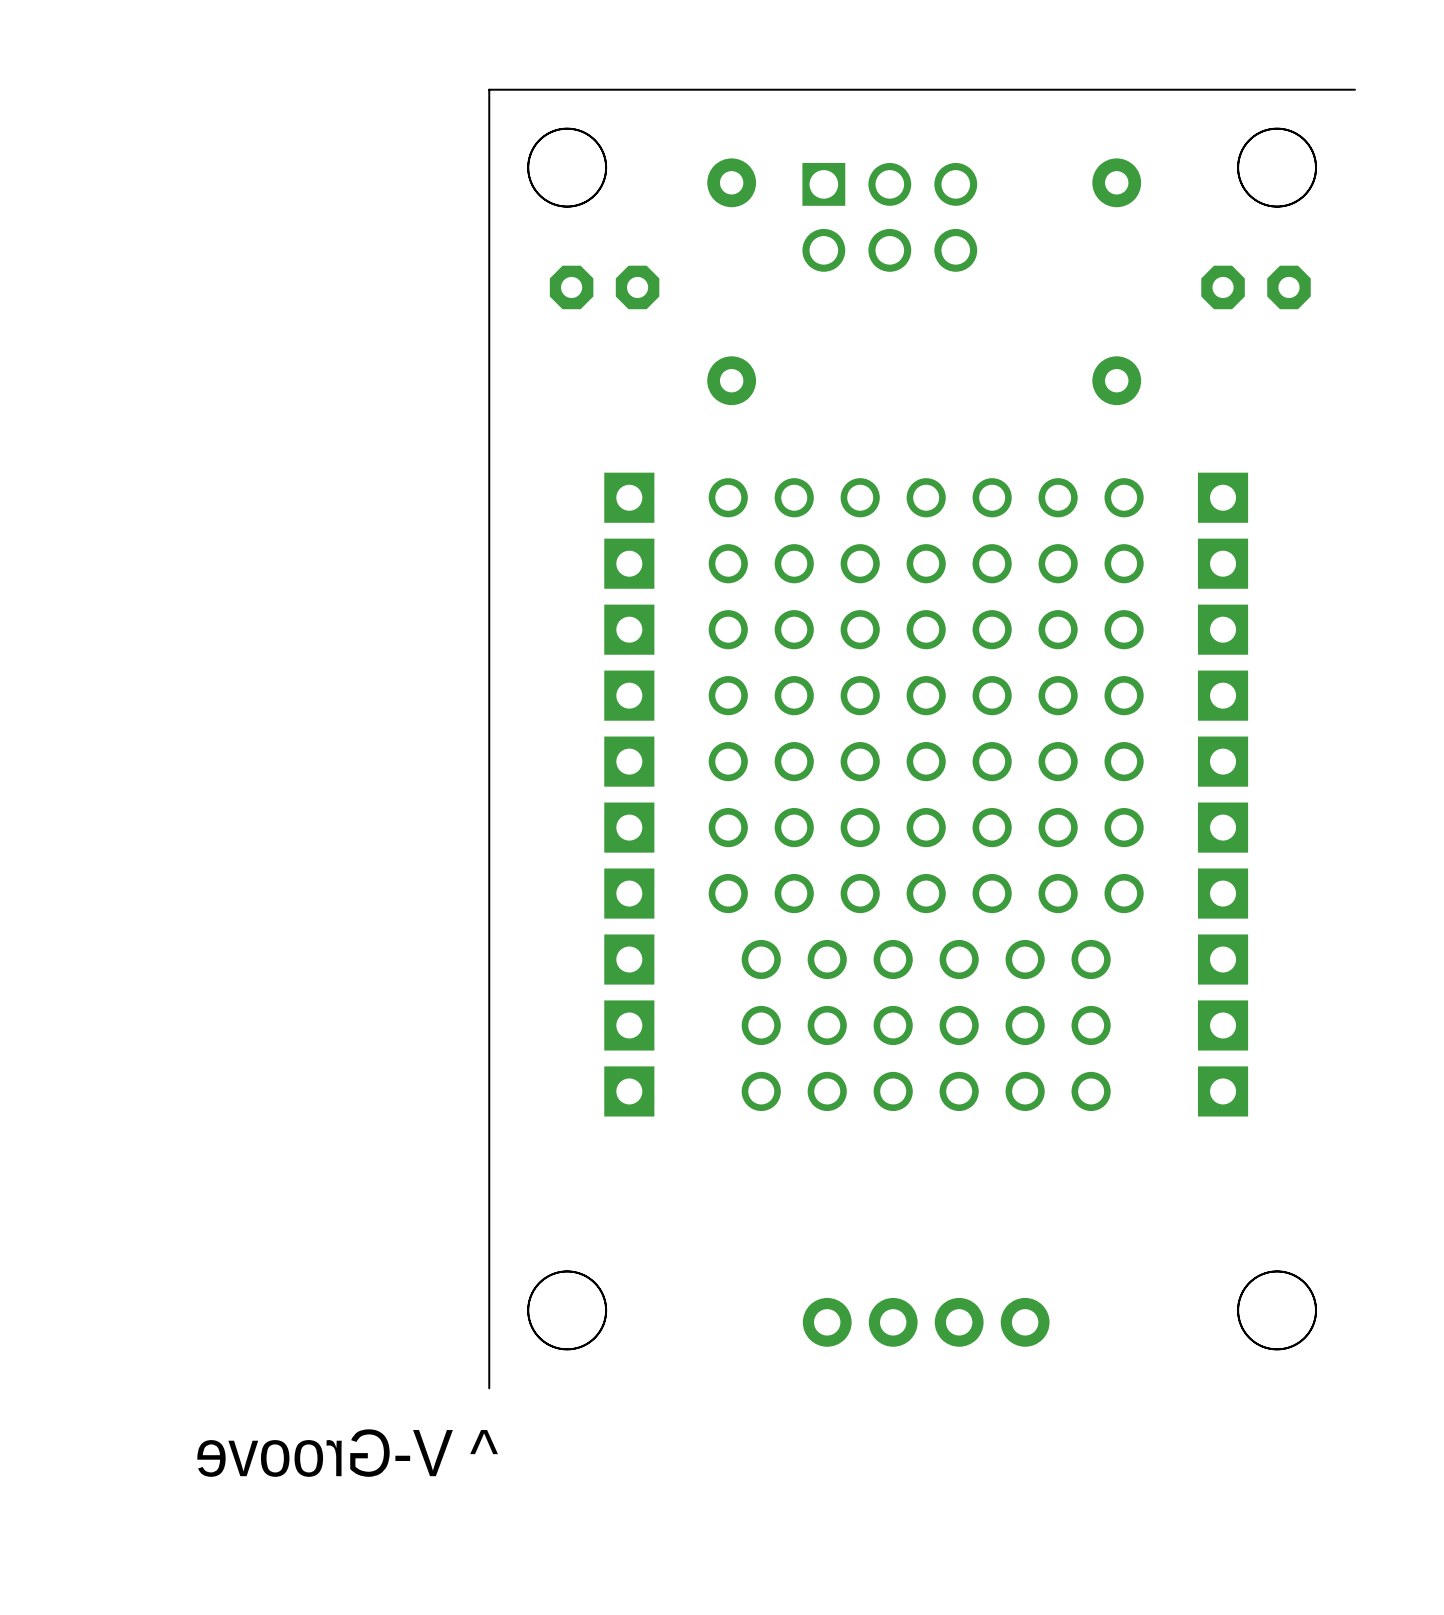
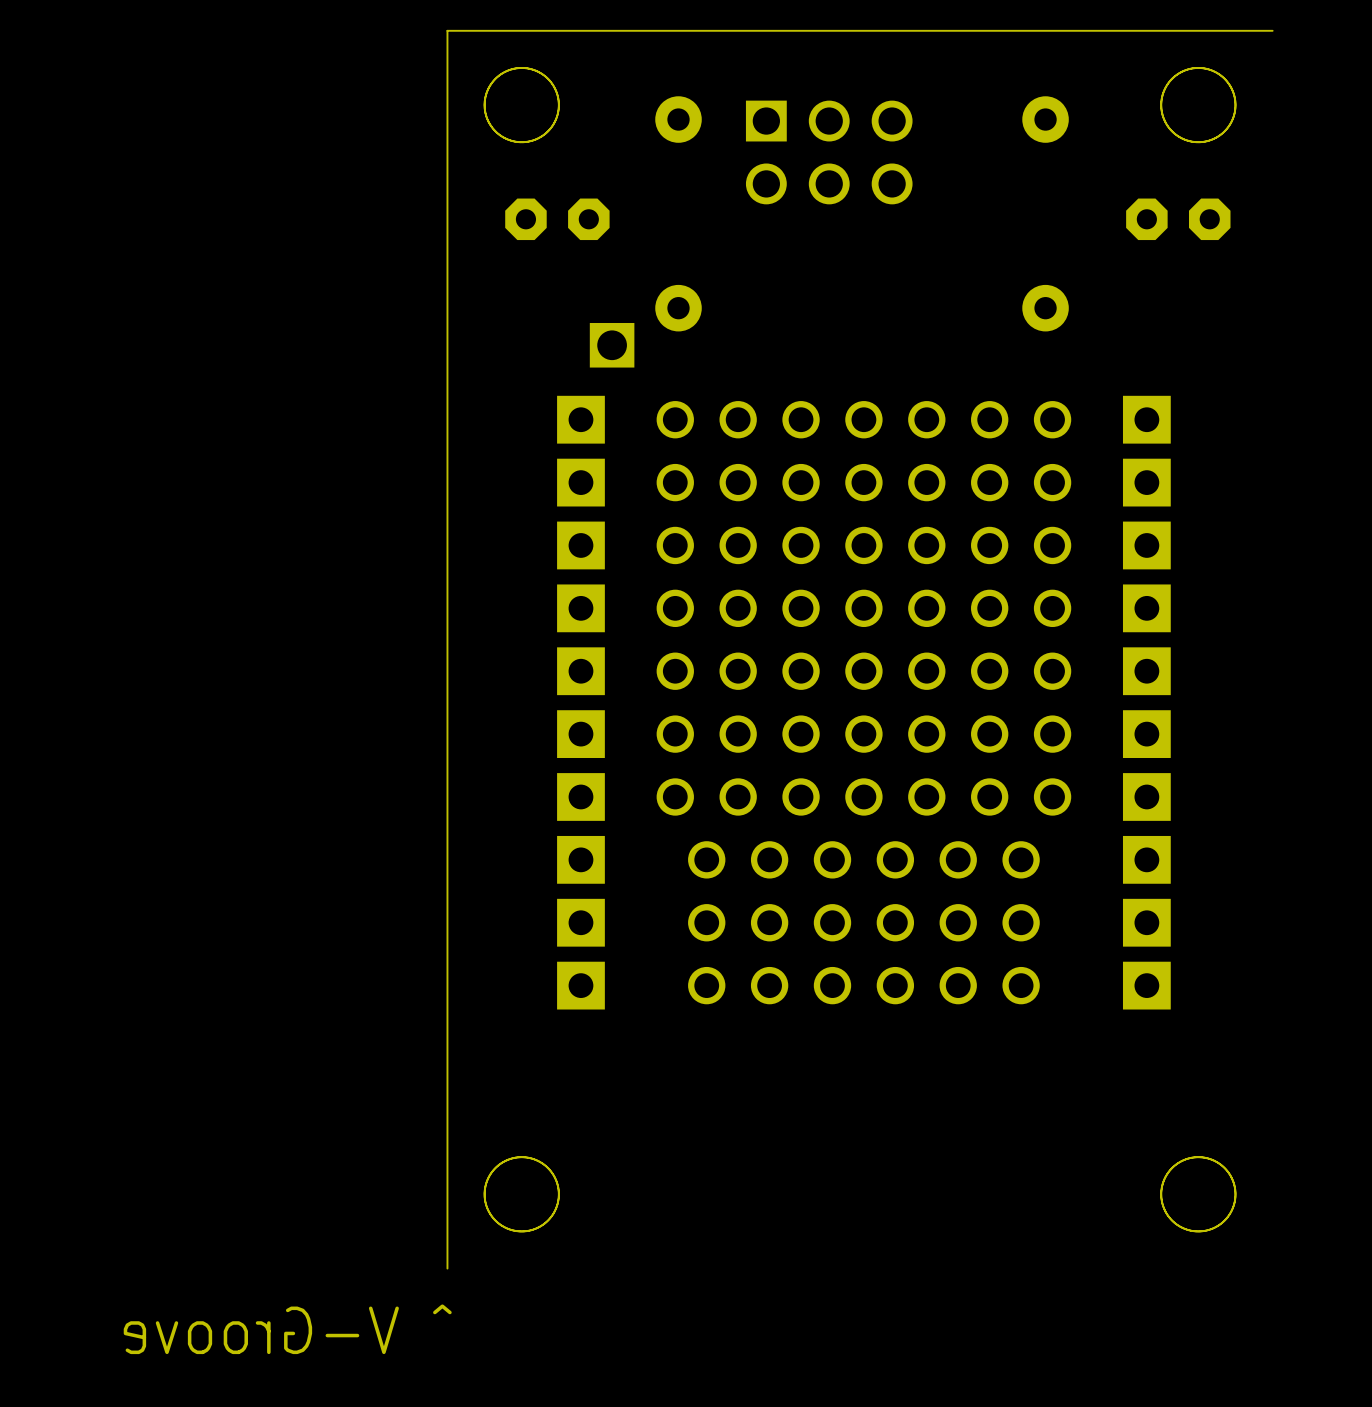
part: none -> (612, 345)
part: (926, 1322) -> none

